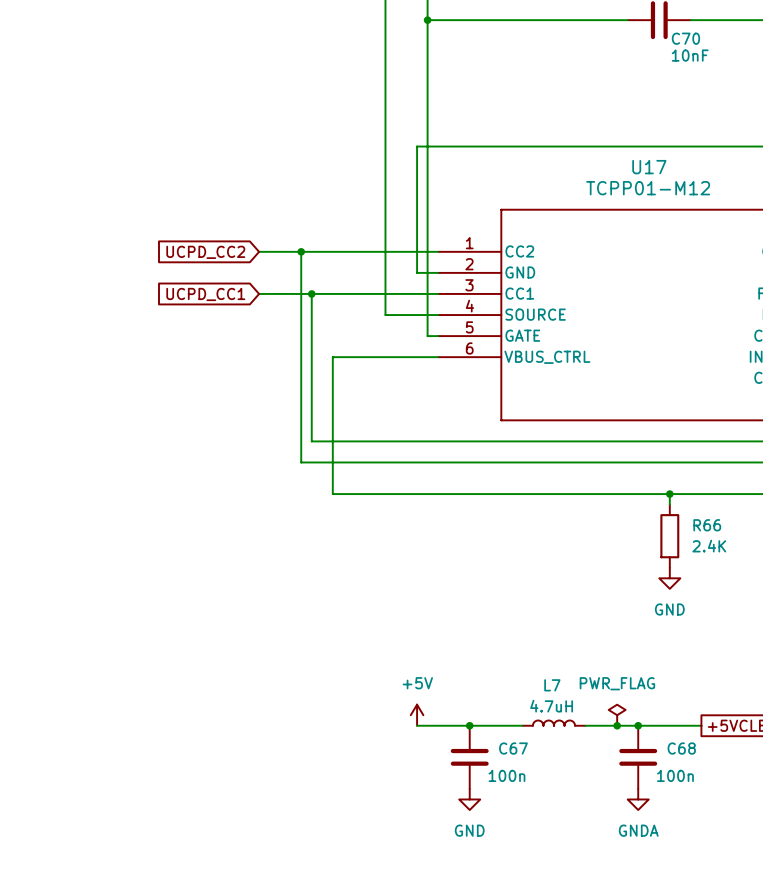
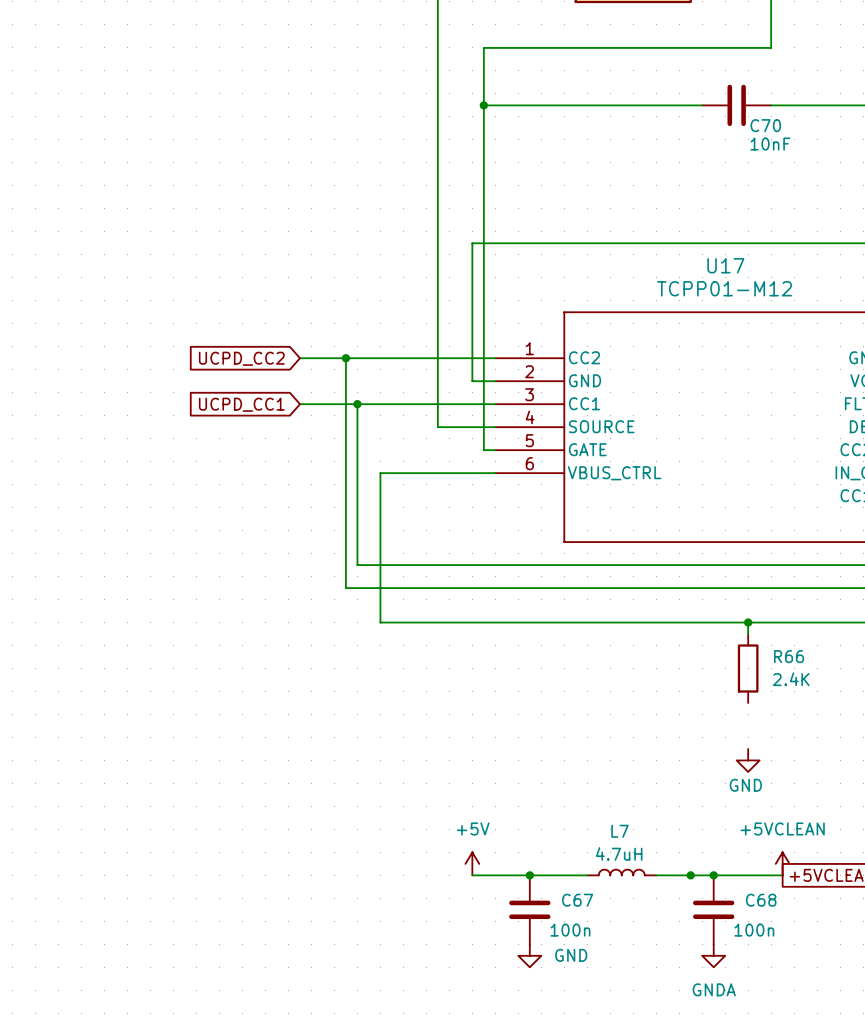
power symbol position: GND (669, 578) -> GND (748, 760)
power symbol text position: GND (669, 609) -> GND (745, 785)
power symbol: PWR_FLAG (617, 715) -> none
power symbol: none -> +5VCLEAN (782, 863)
power symbol text position: GND (469, 830) -> GND (571, 955)

